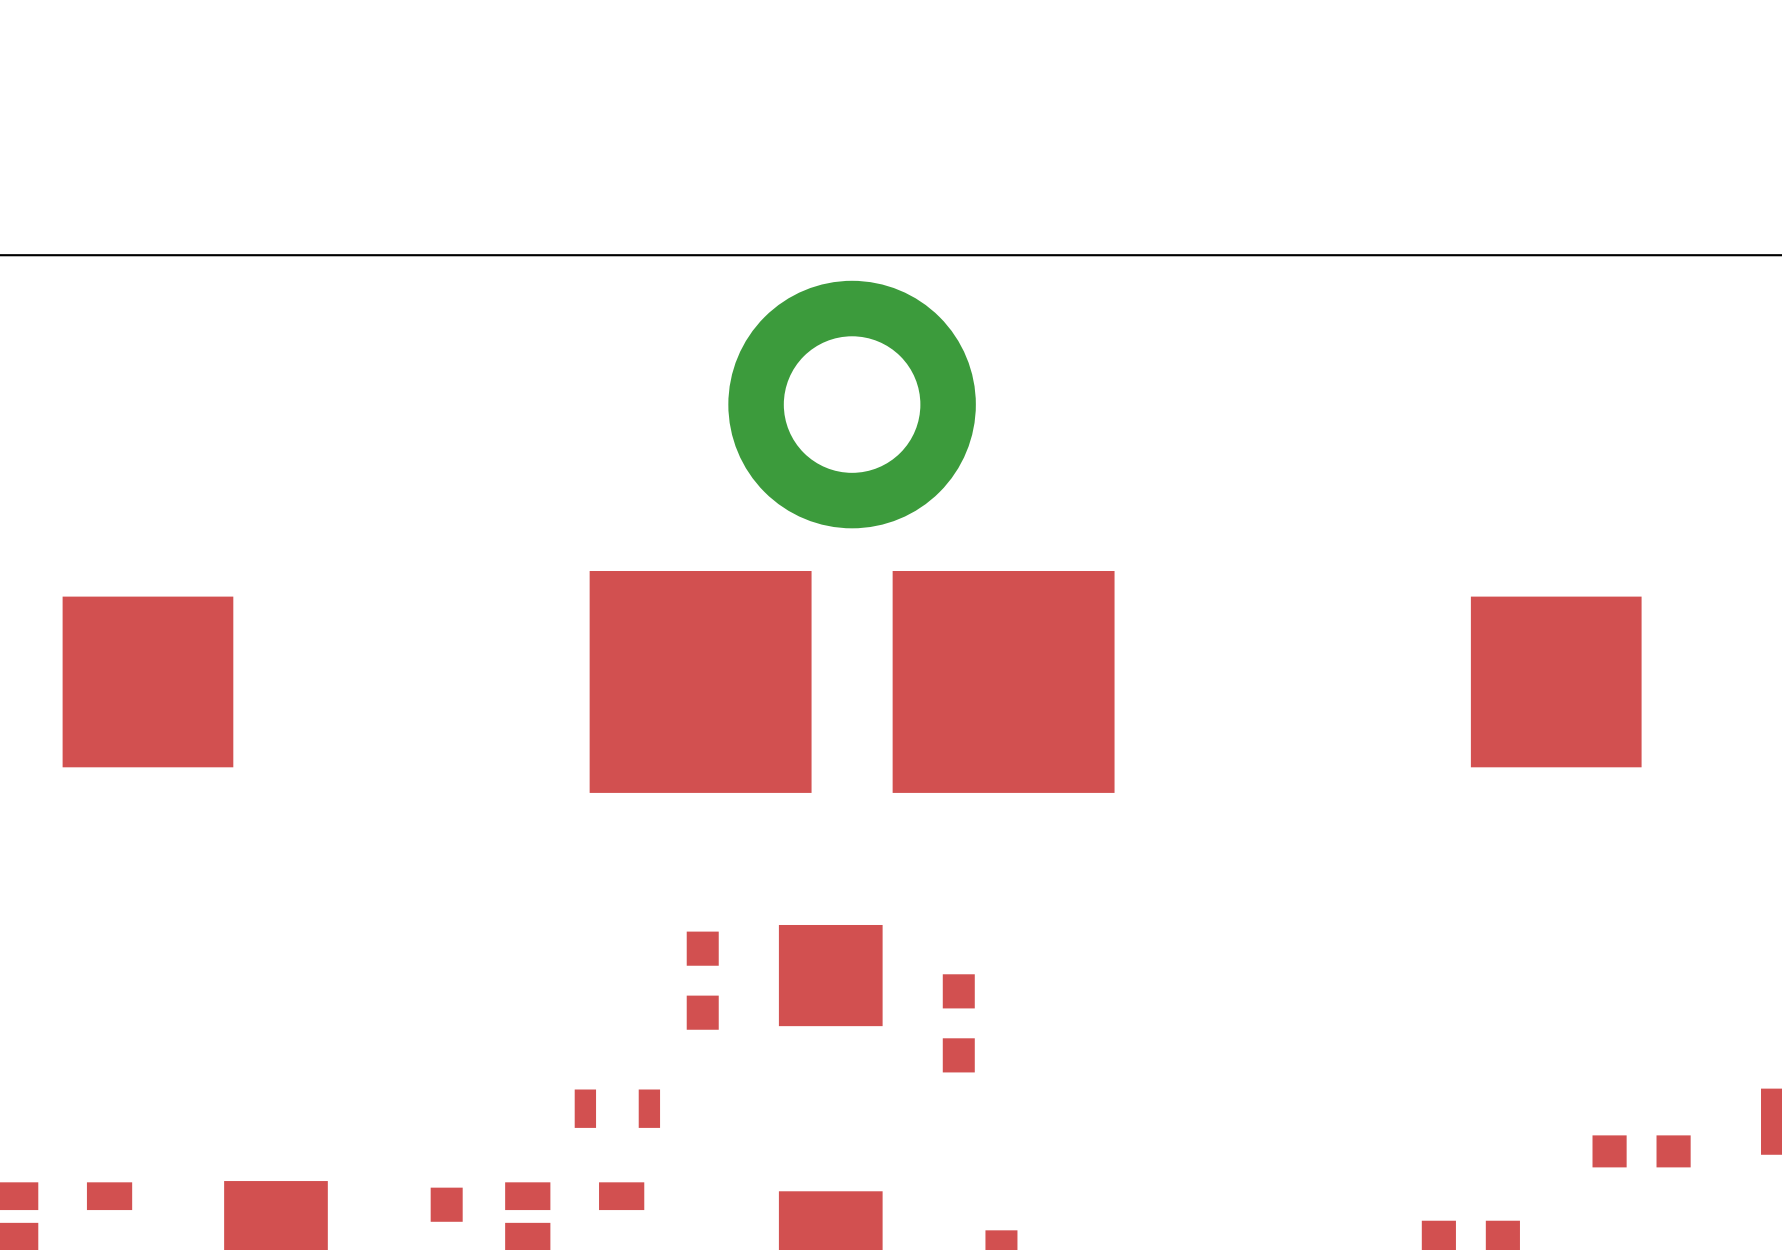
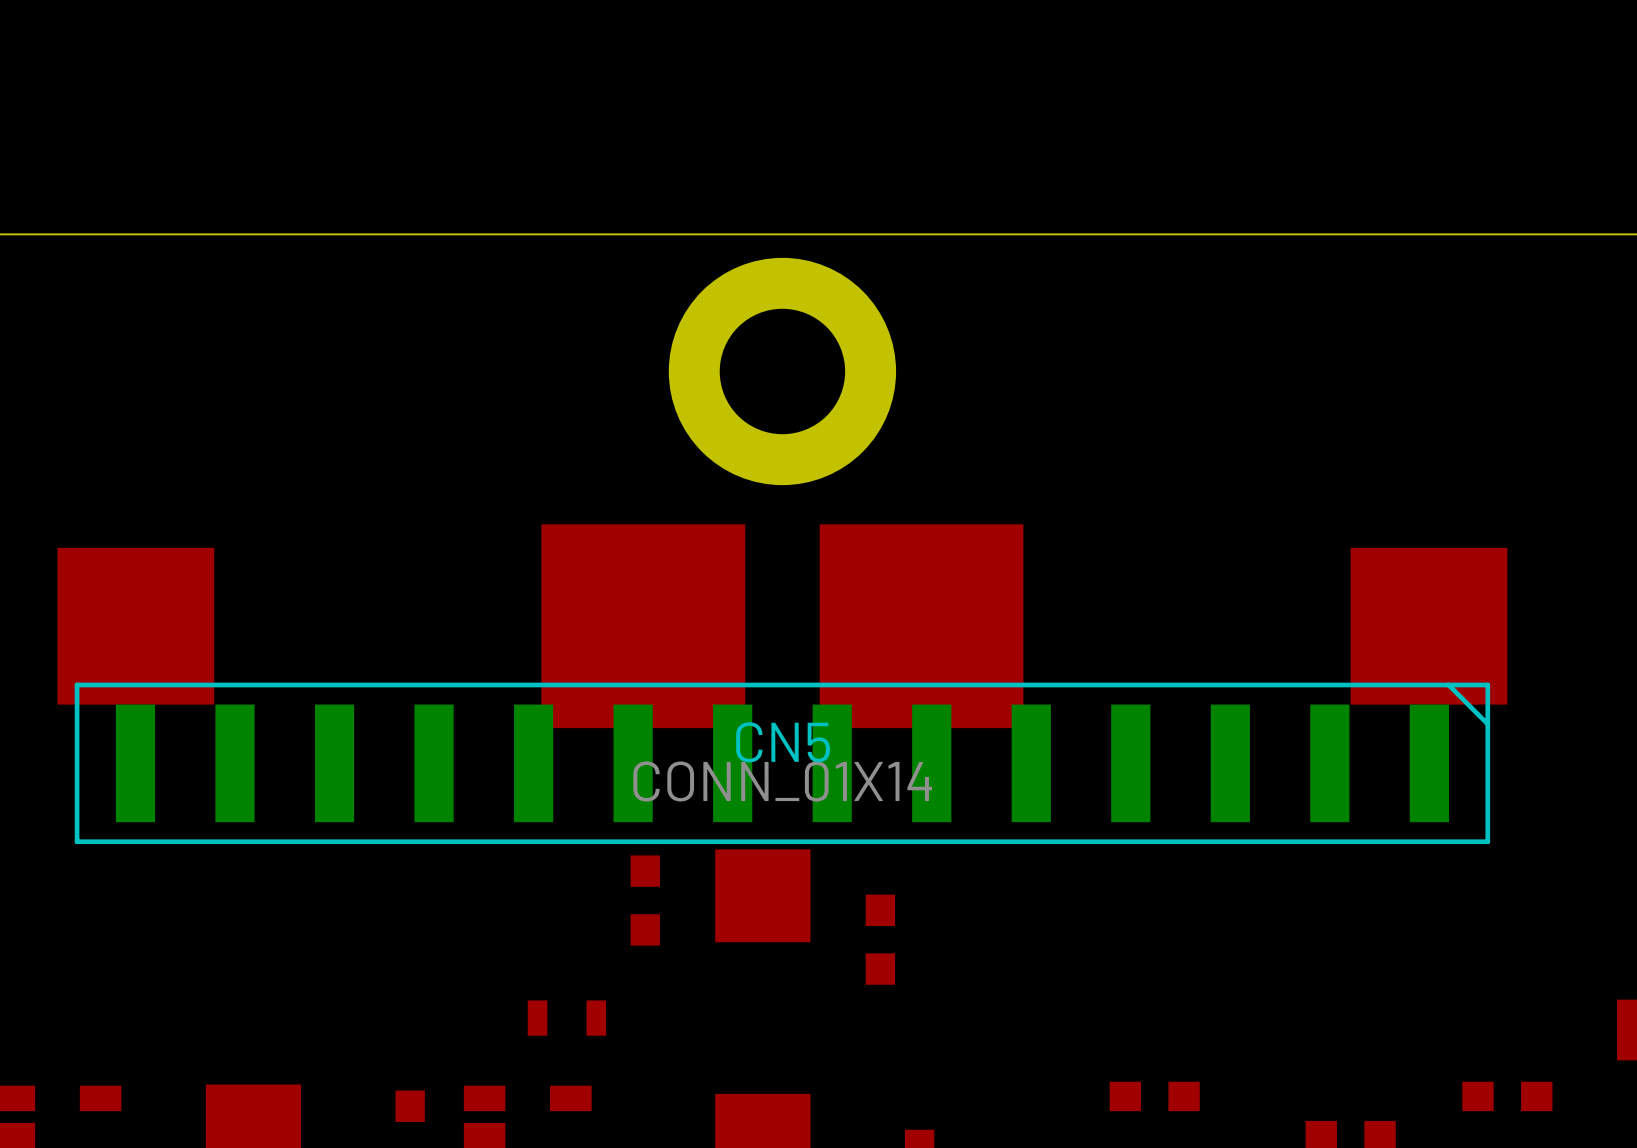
CN5: none -> CONN_01X14 (782, 763)
part position: (1641, 1151) -> (1507, 1096)
part: none -> (1154, 1096)

